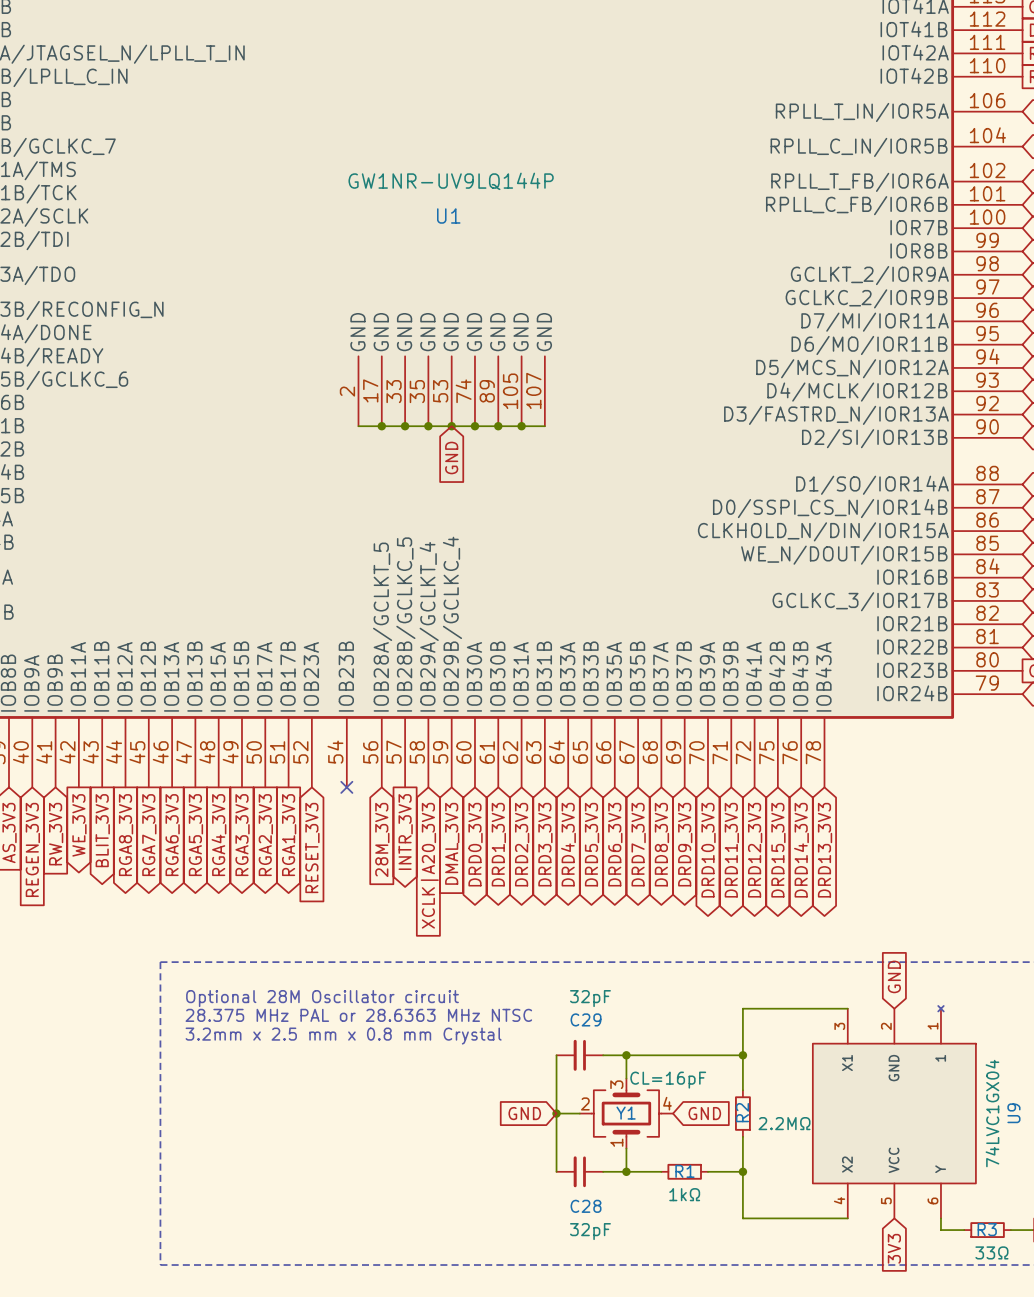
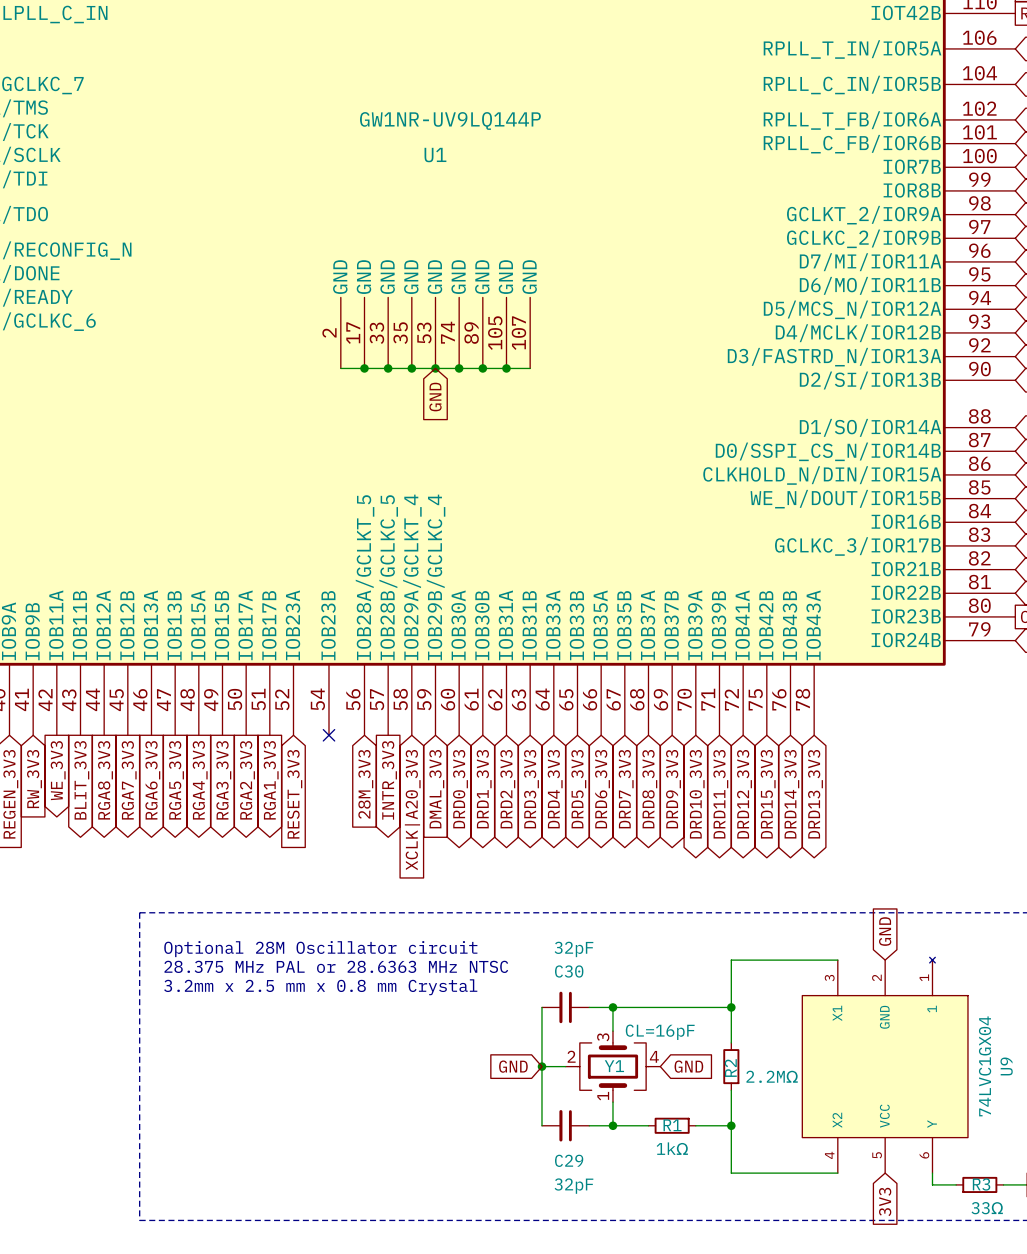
C29 name: C29 (586, 1019) -> C30 (569, 971)
C28 name: C28 (586, 1206) -> C29 (569, 1160)

